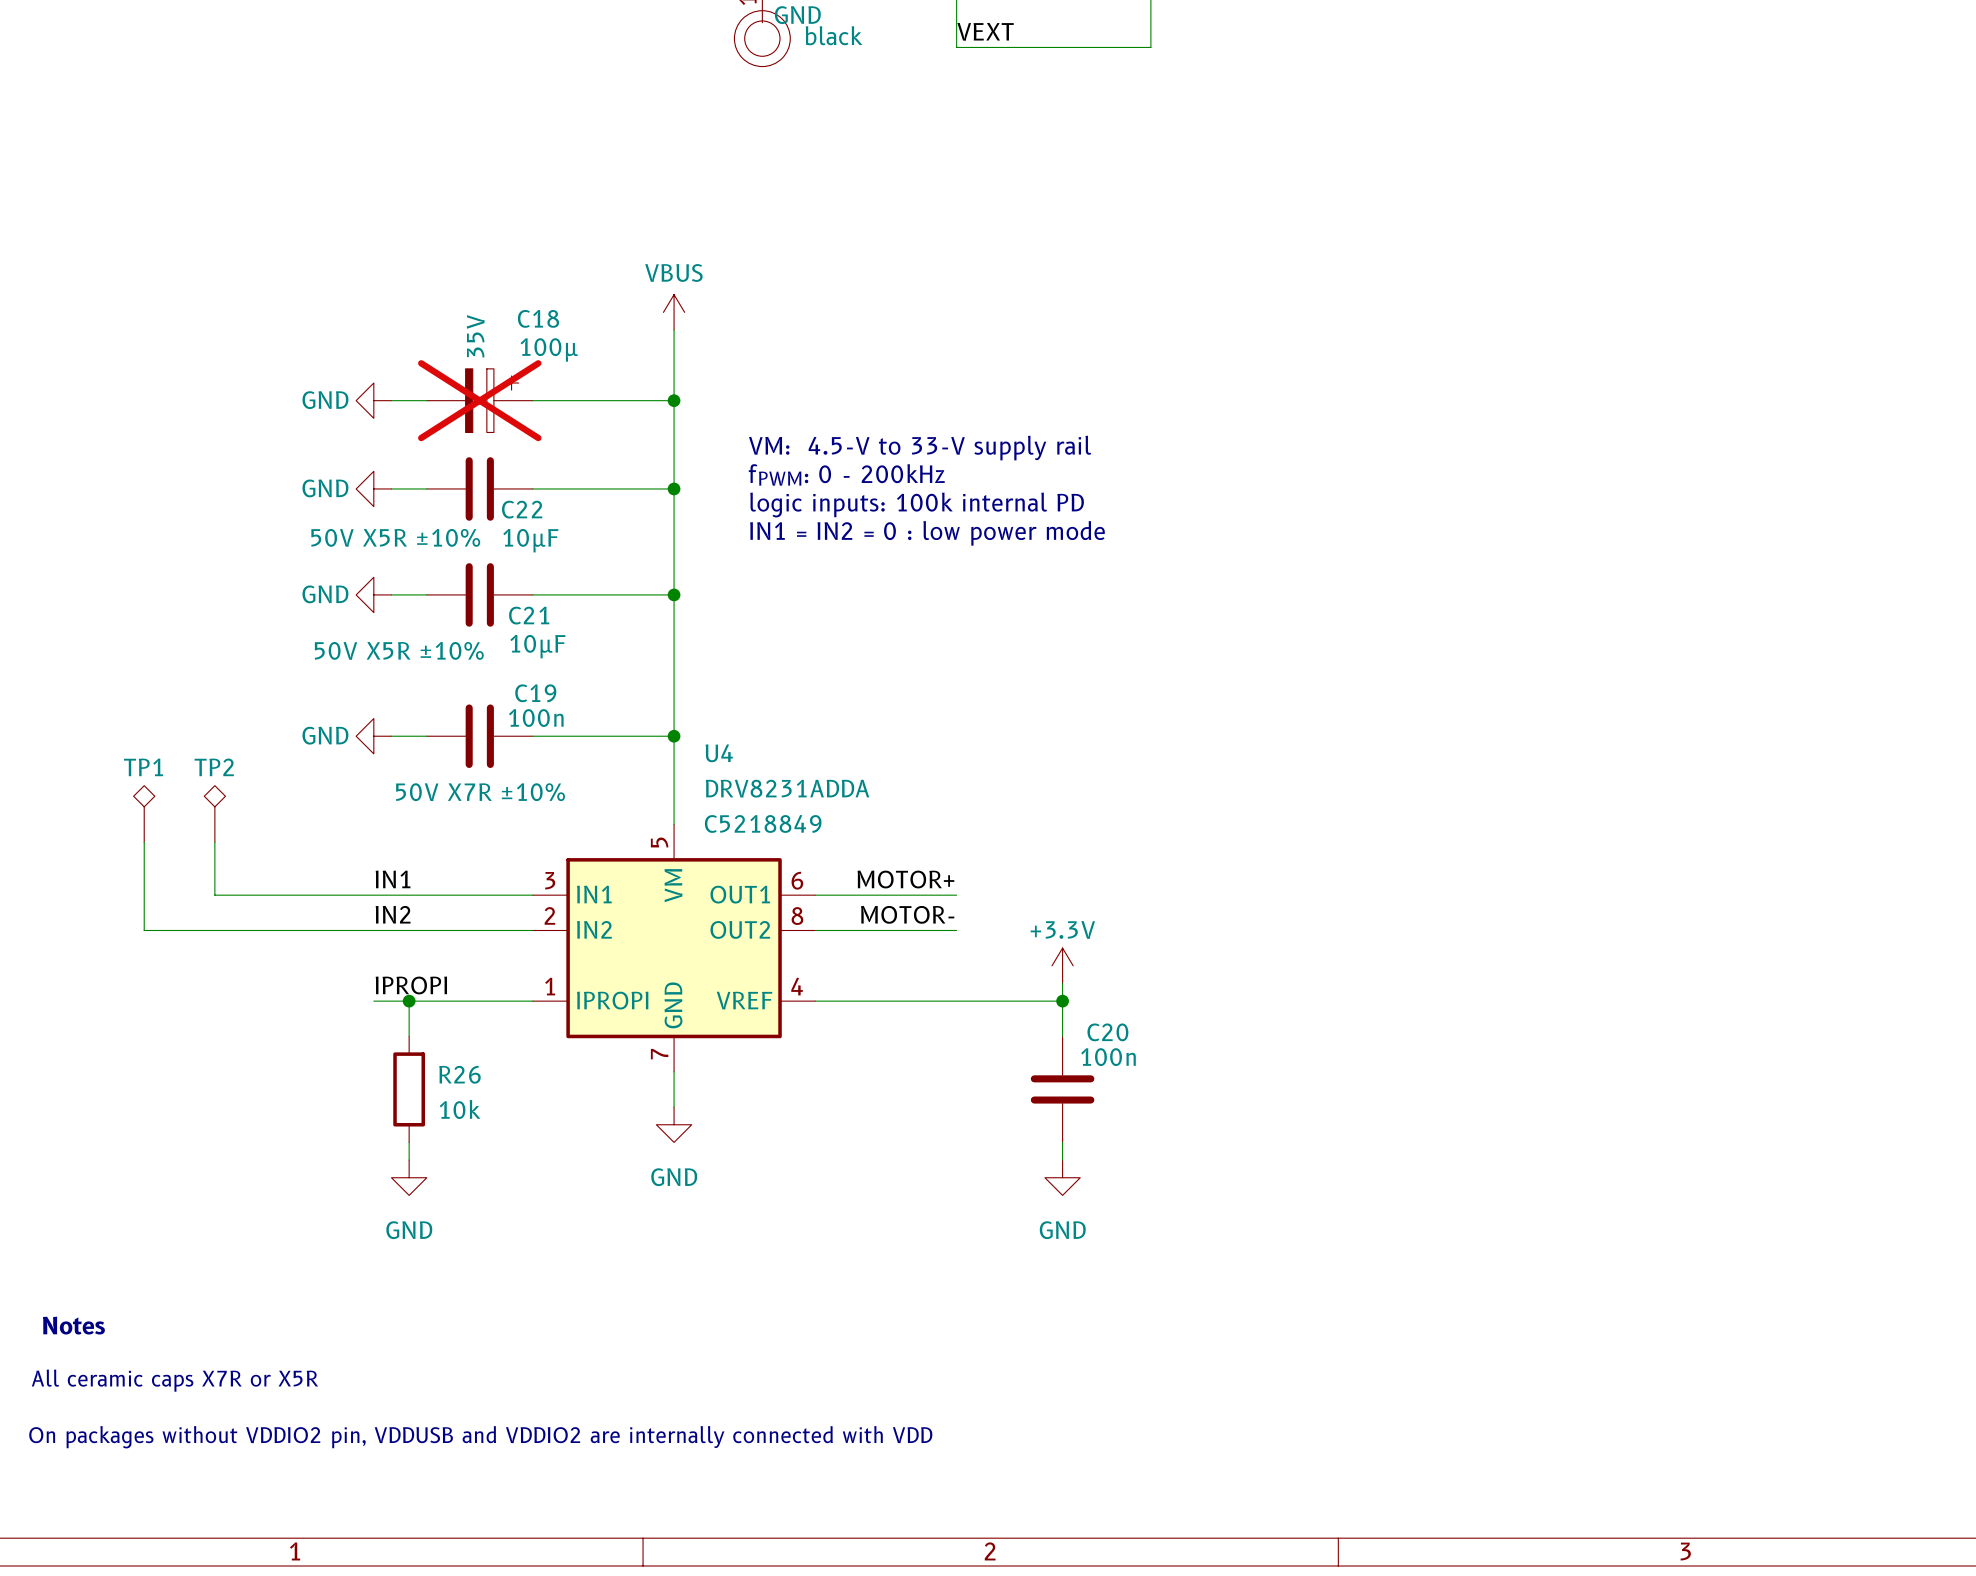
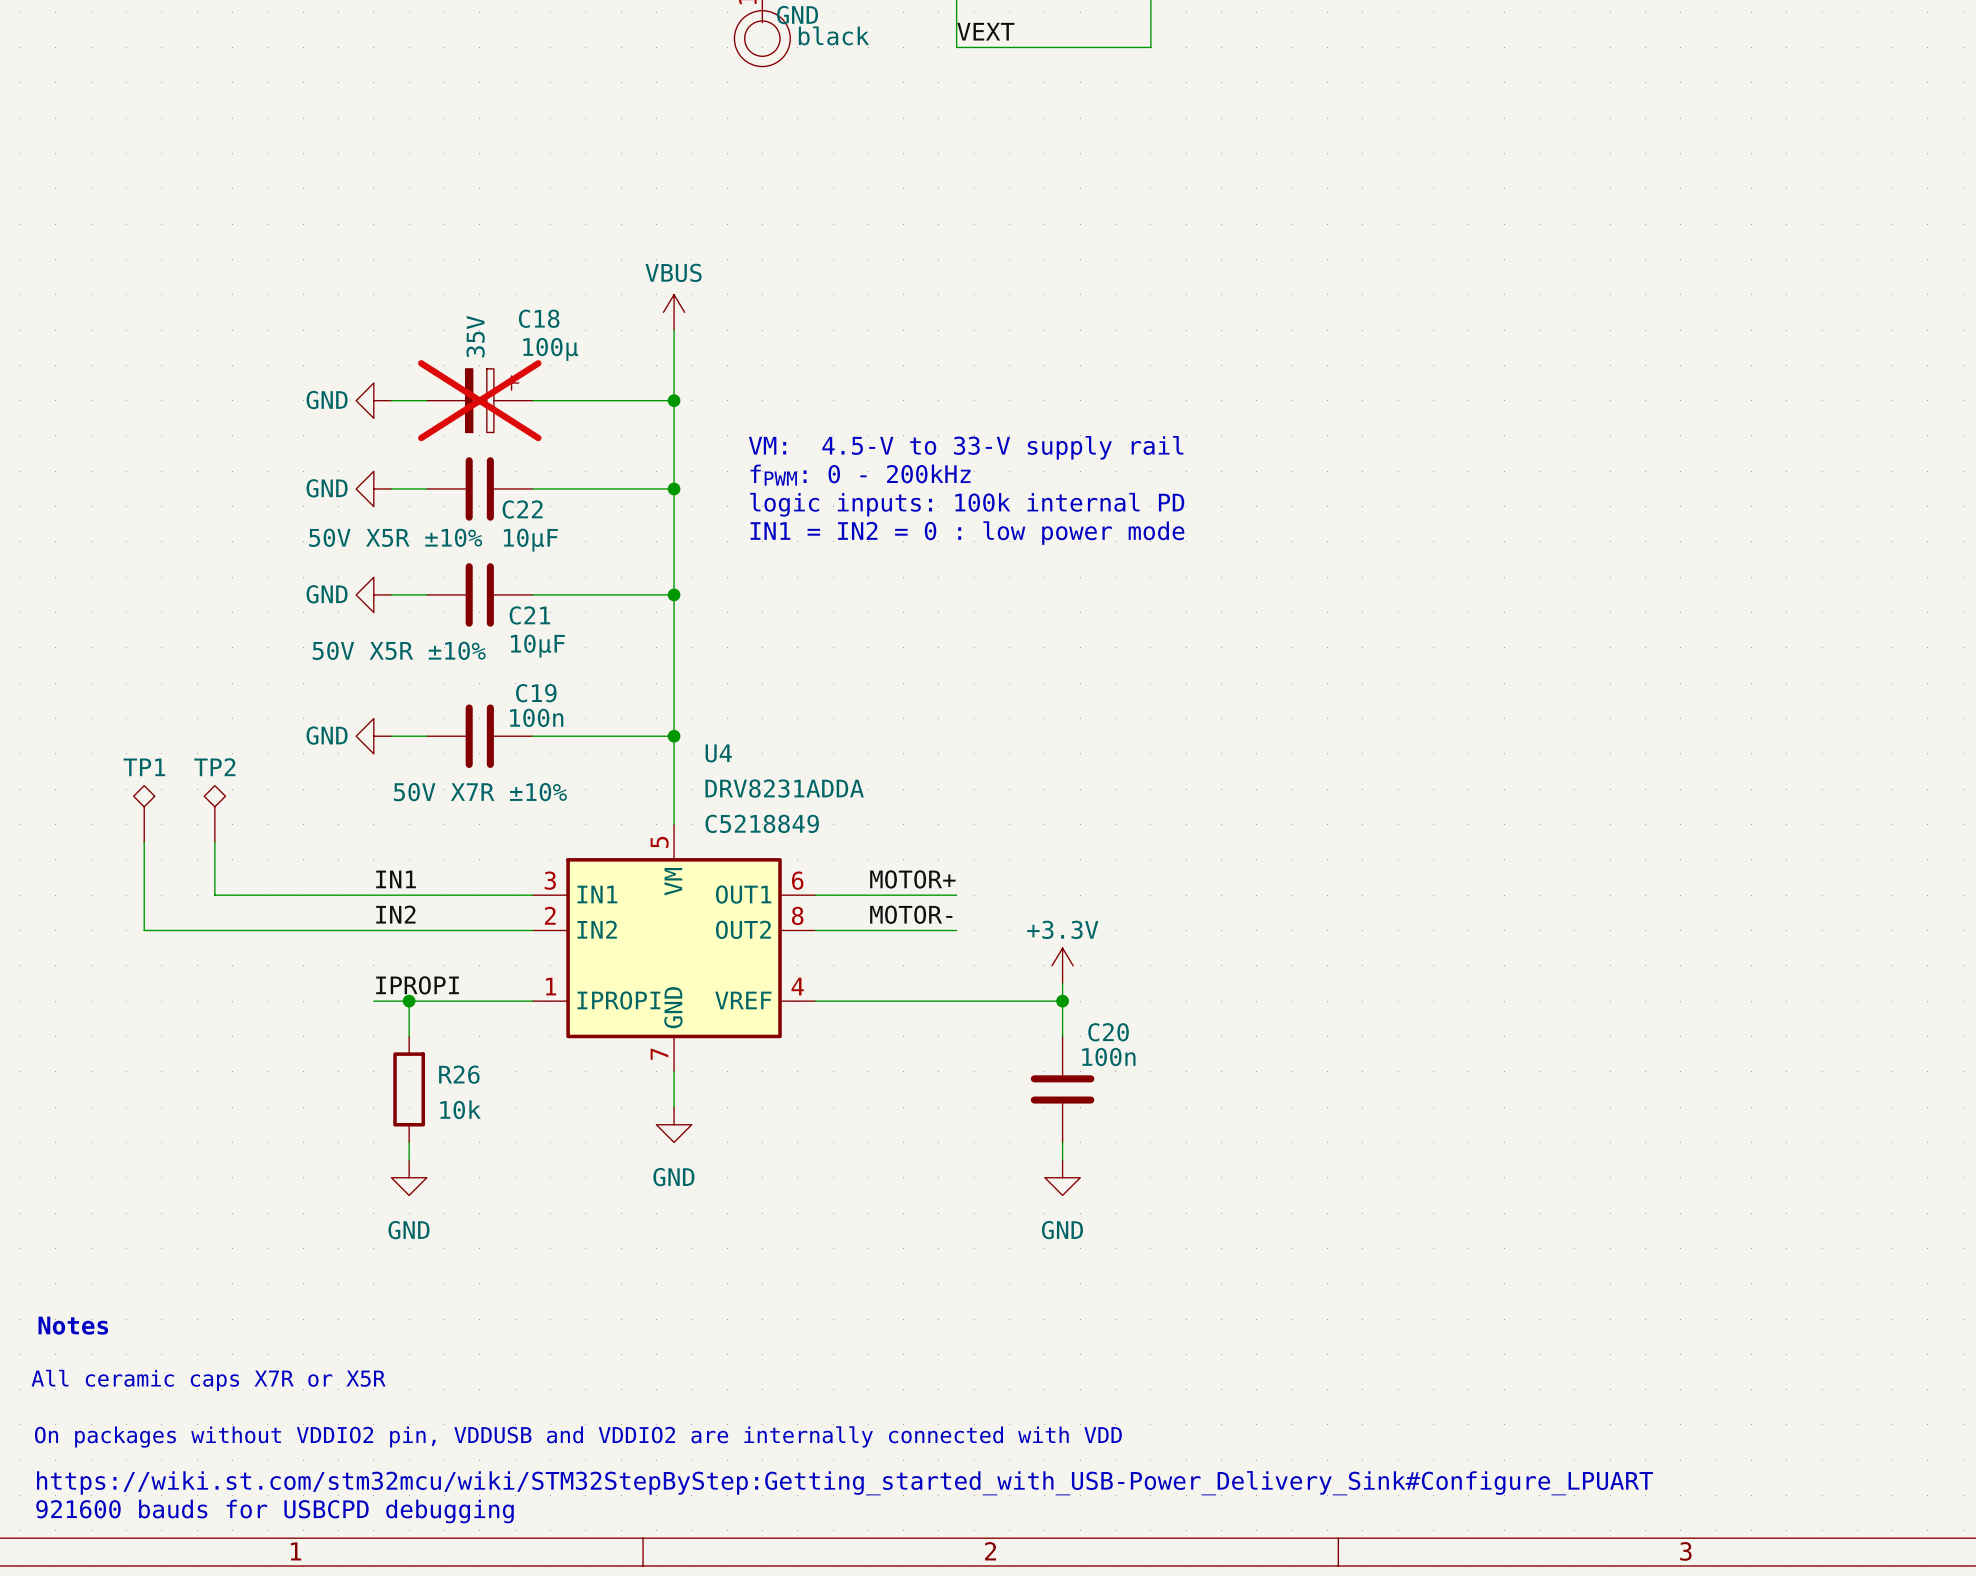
text: none -> https://wiki.st.com/stm32mcu/wiki/STM32StepByStep:Getting_started_with_USB-Power_Delivery_Sink#Configure_LPUART (845, 1483)
text: none -> 921600 bauds for USBCPD debugging (274, 1511)

